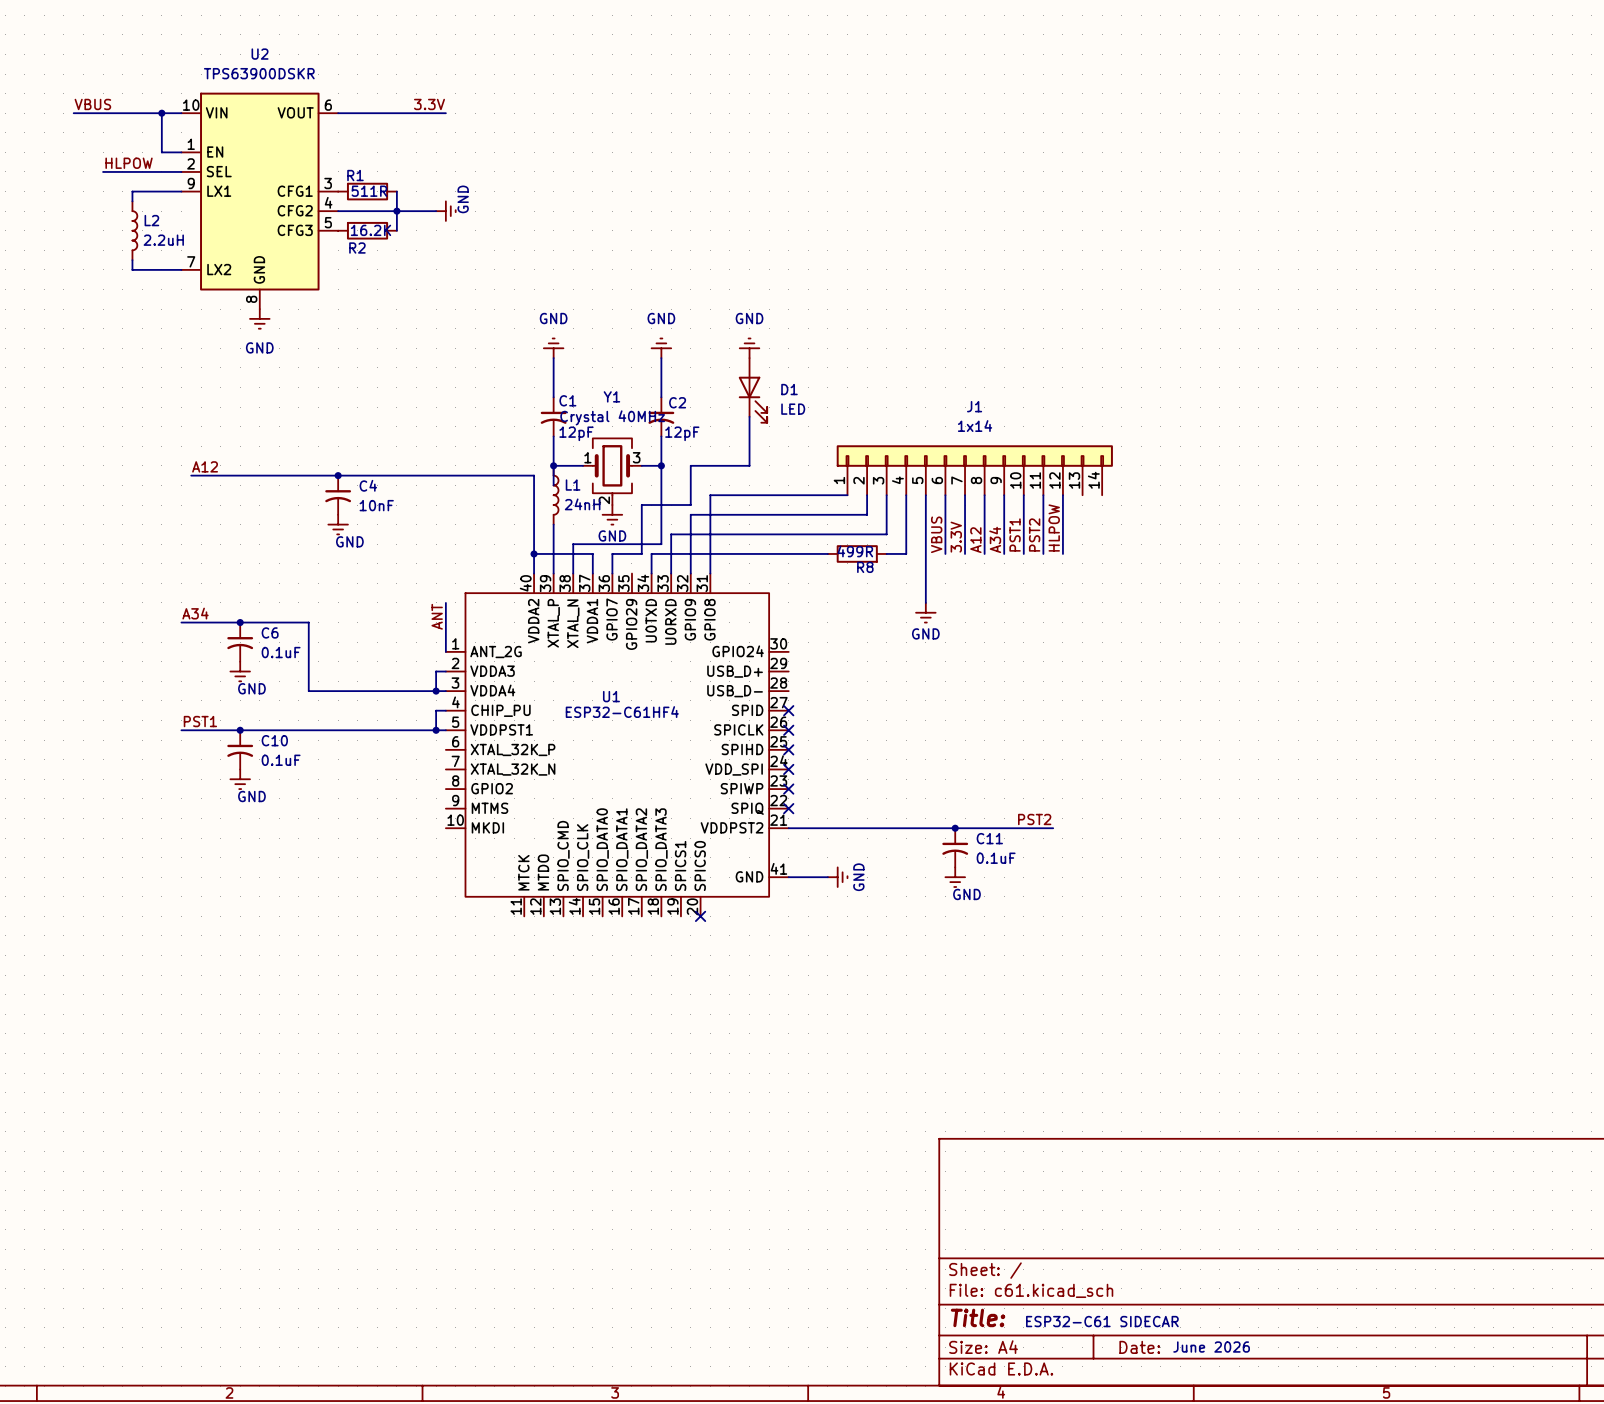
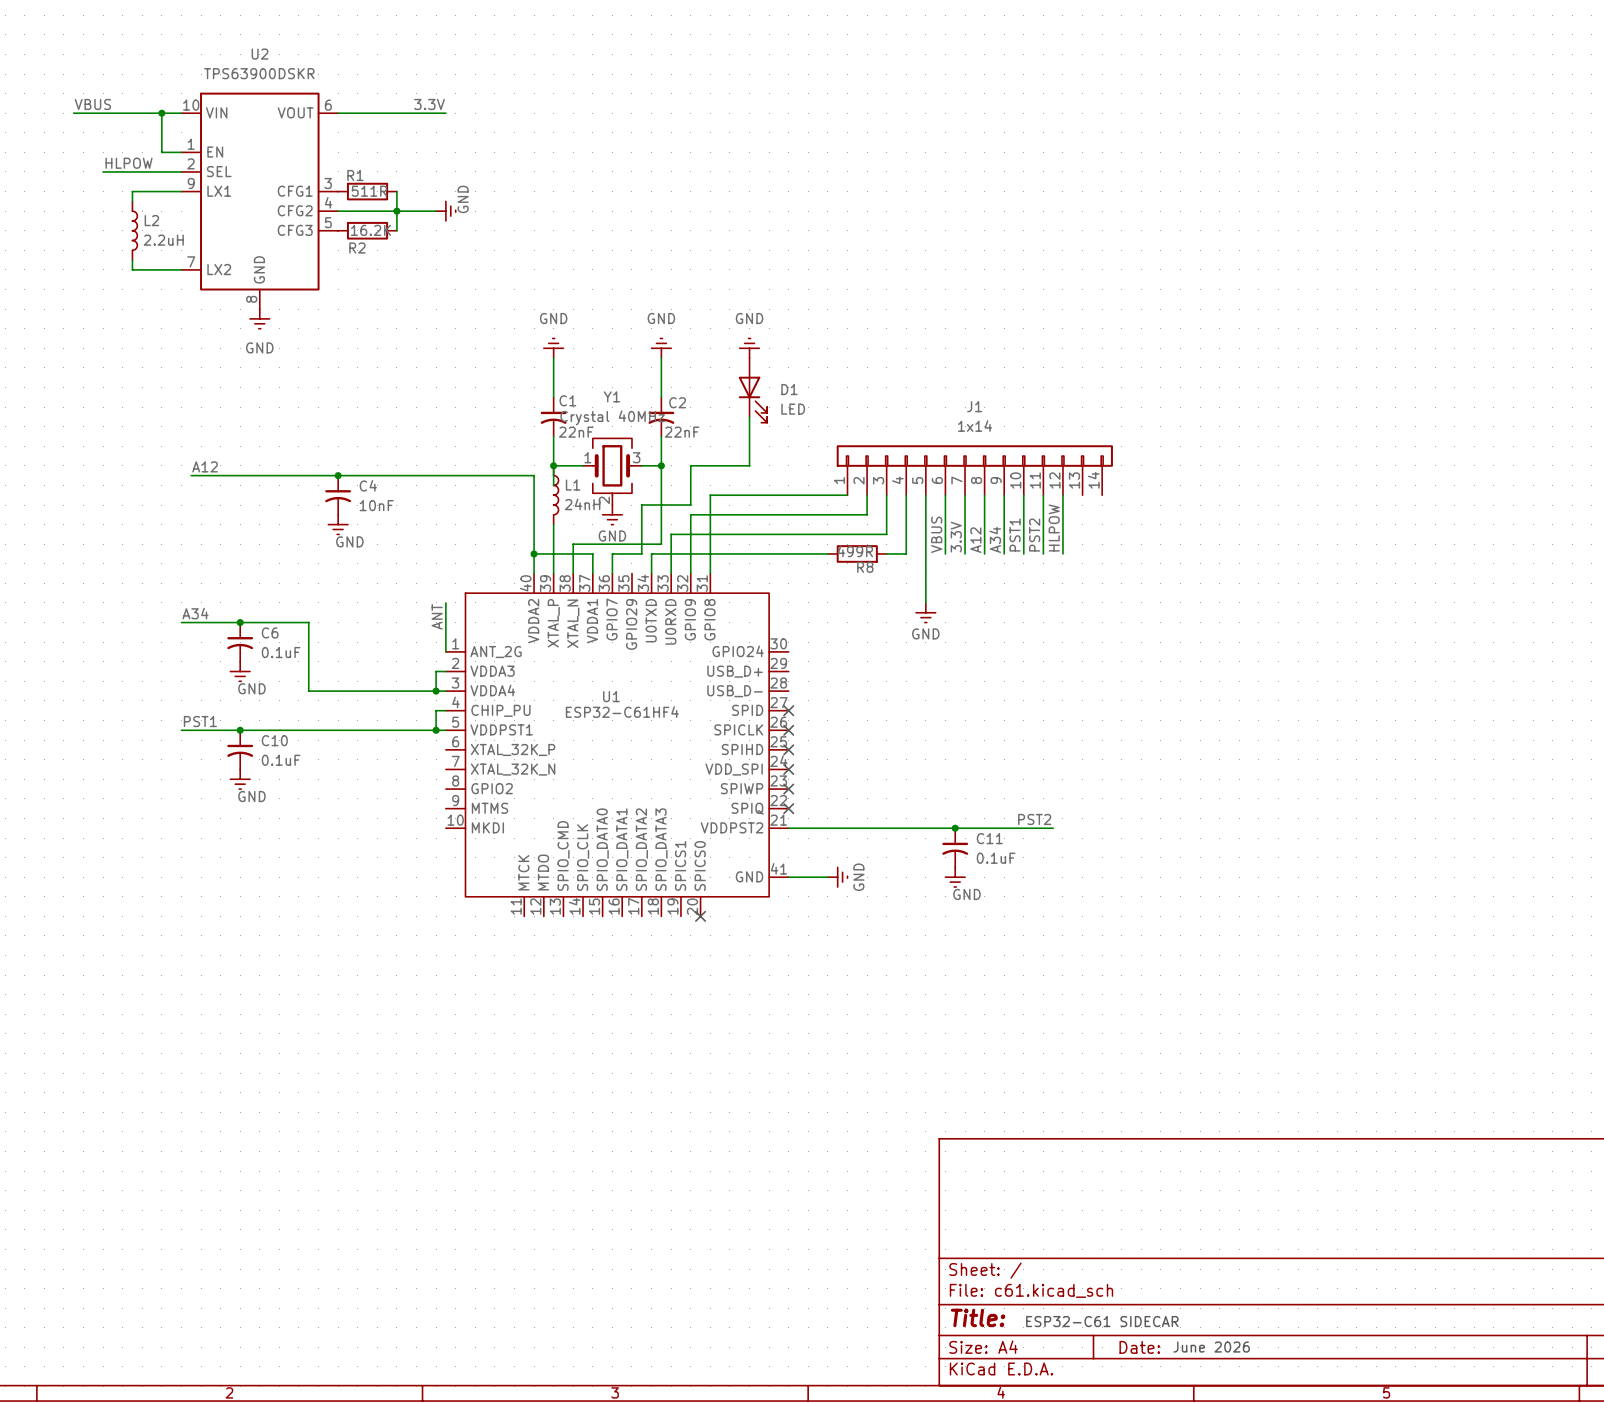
C1 value: 12pF (576, 433) -> 22nF (576, 432)
C2 value: 12pF (682, 433) -> 22nF (682, 432)

